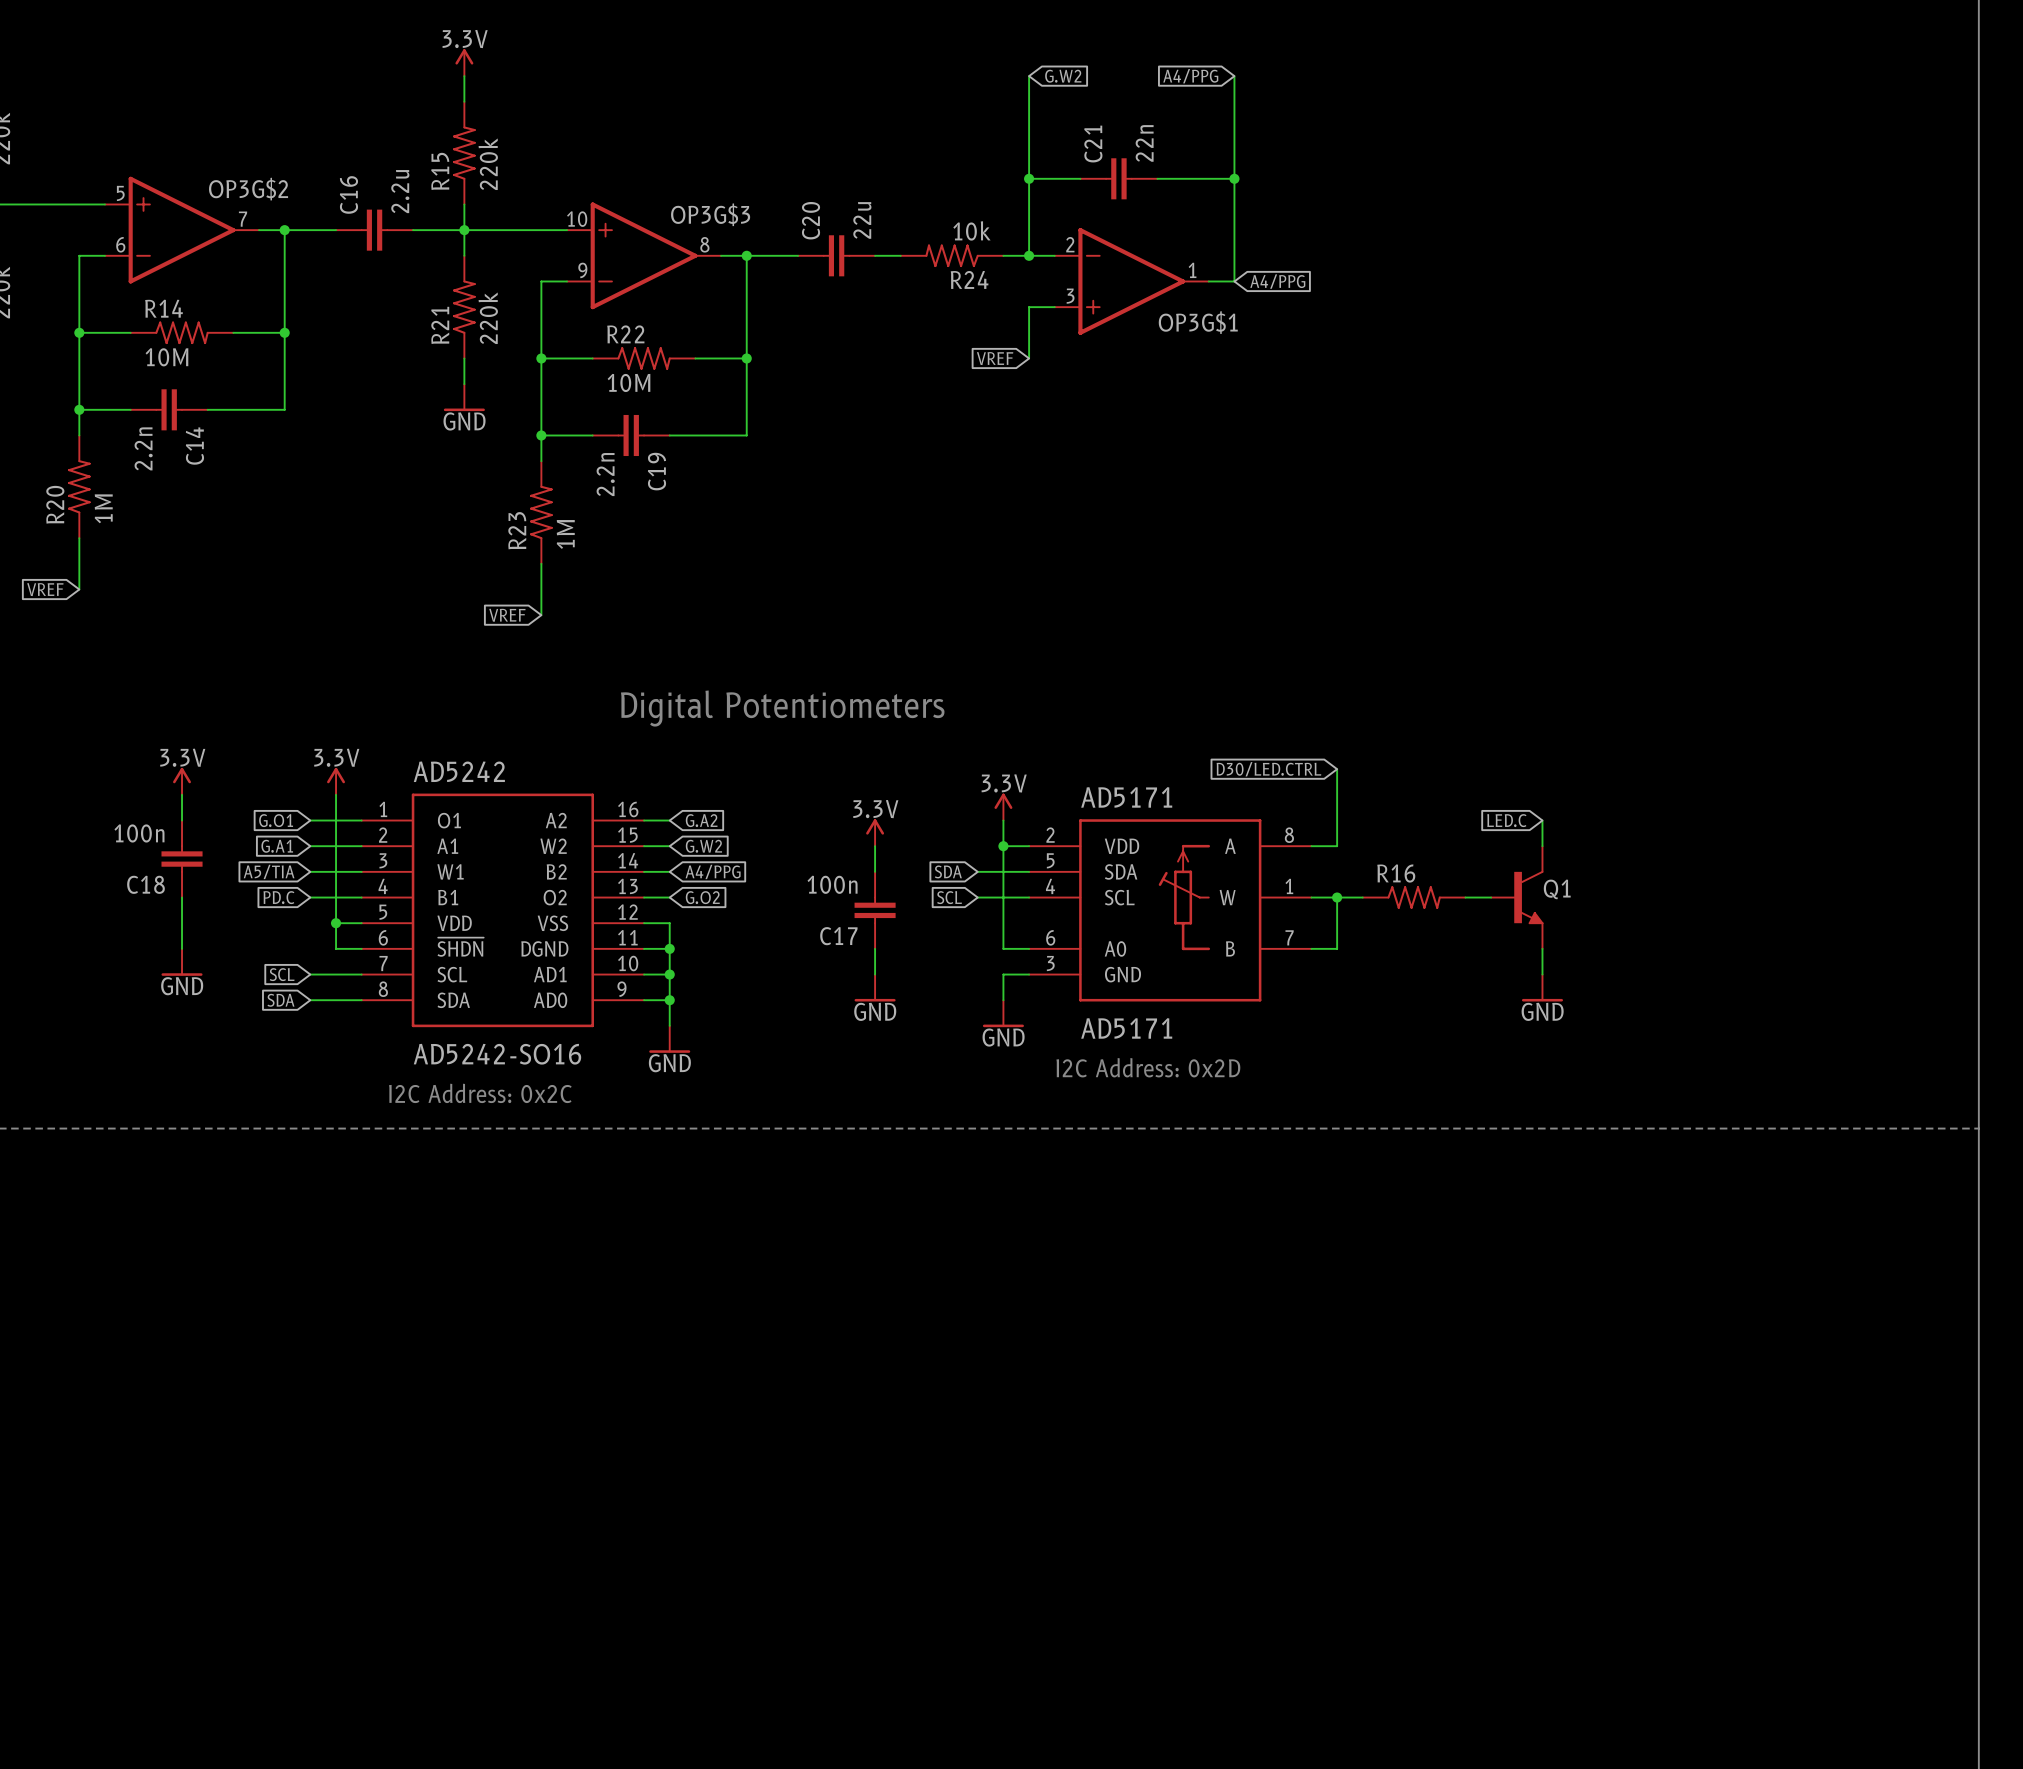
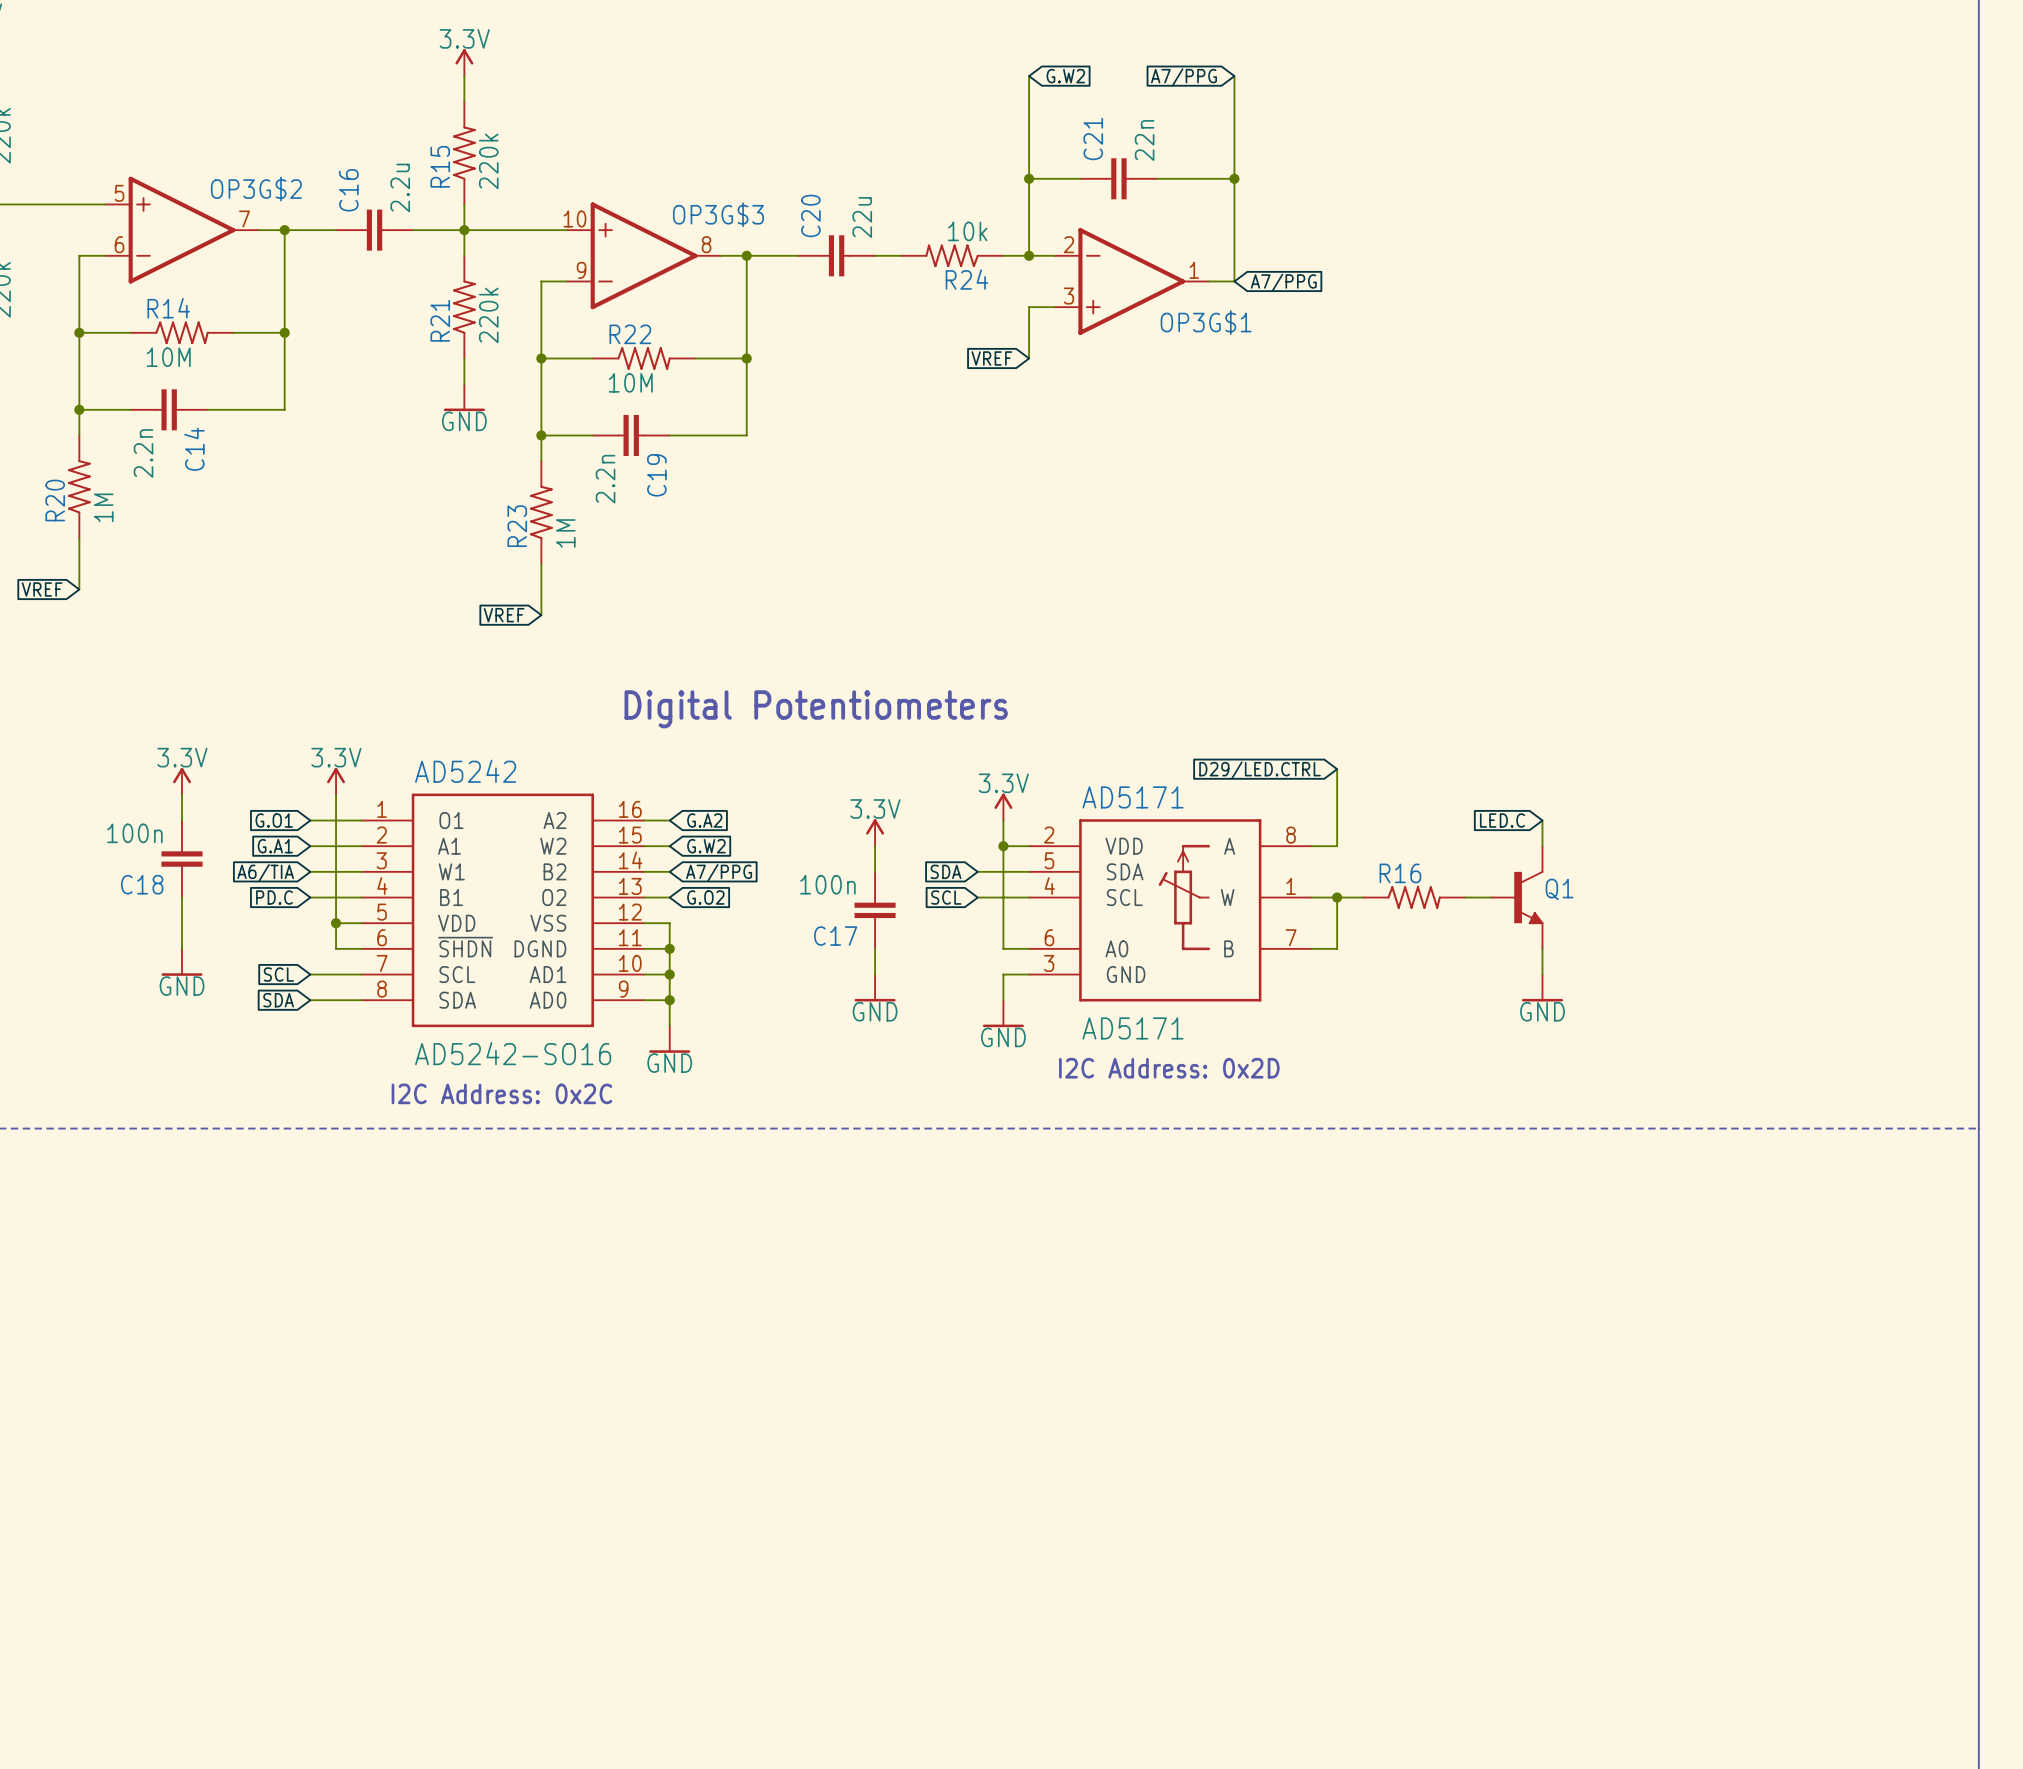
global label: A4/PPG (1190, 76) -> A7/PPG (1183, 77)
global label: A4/PPG (1277, 281) -> A7/PPG (1283, 282)
global label: D30/LED.CTRL (1268, 769) -> D29/LED.CTRL (1259, 770)
global label: A5/TIA (269, 871) -> A6/TIA (265, 873)
global label: A4/PPG (713, 871) -> A7/PPG (719, 873)

